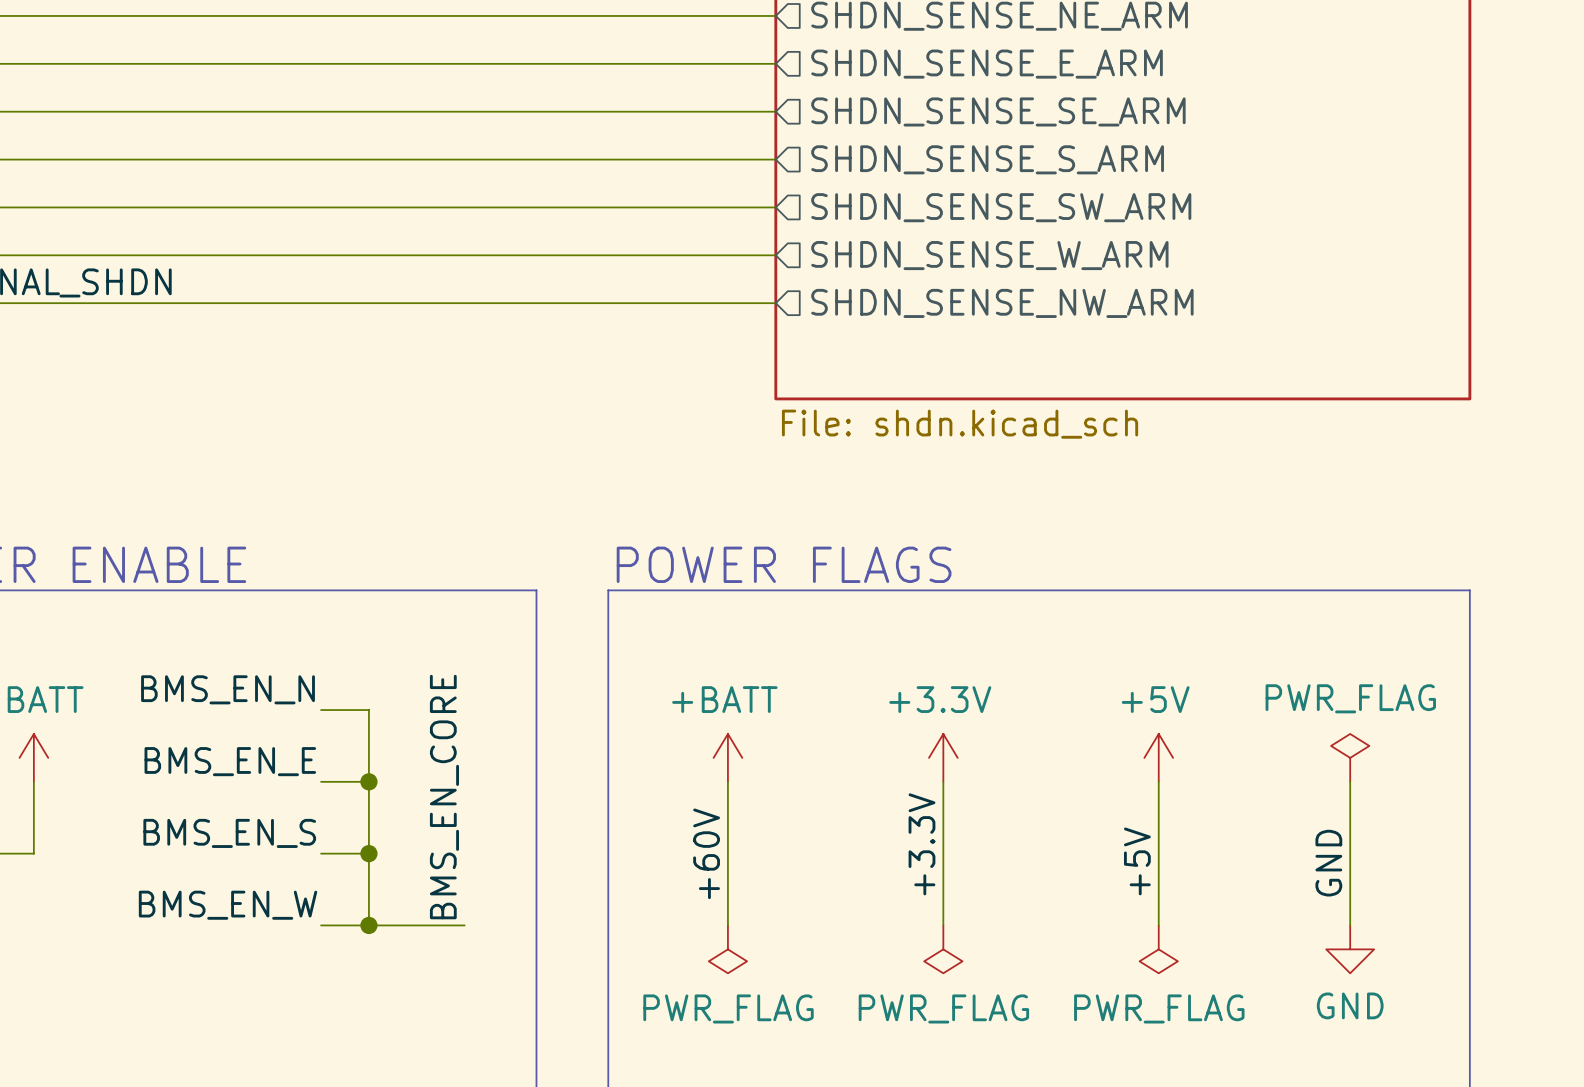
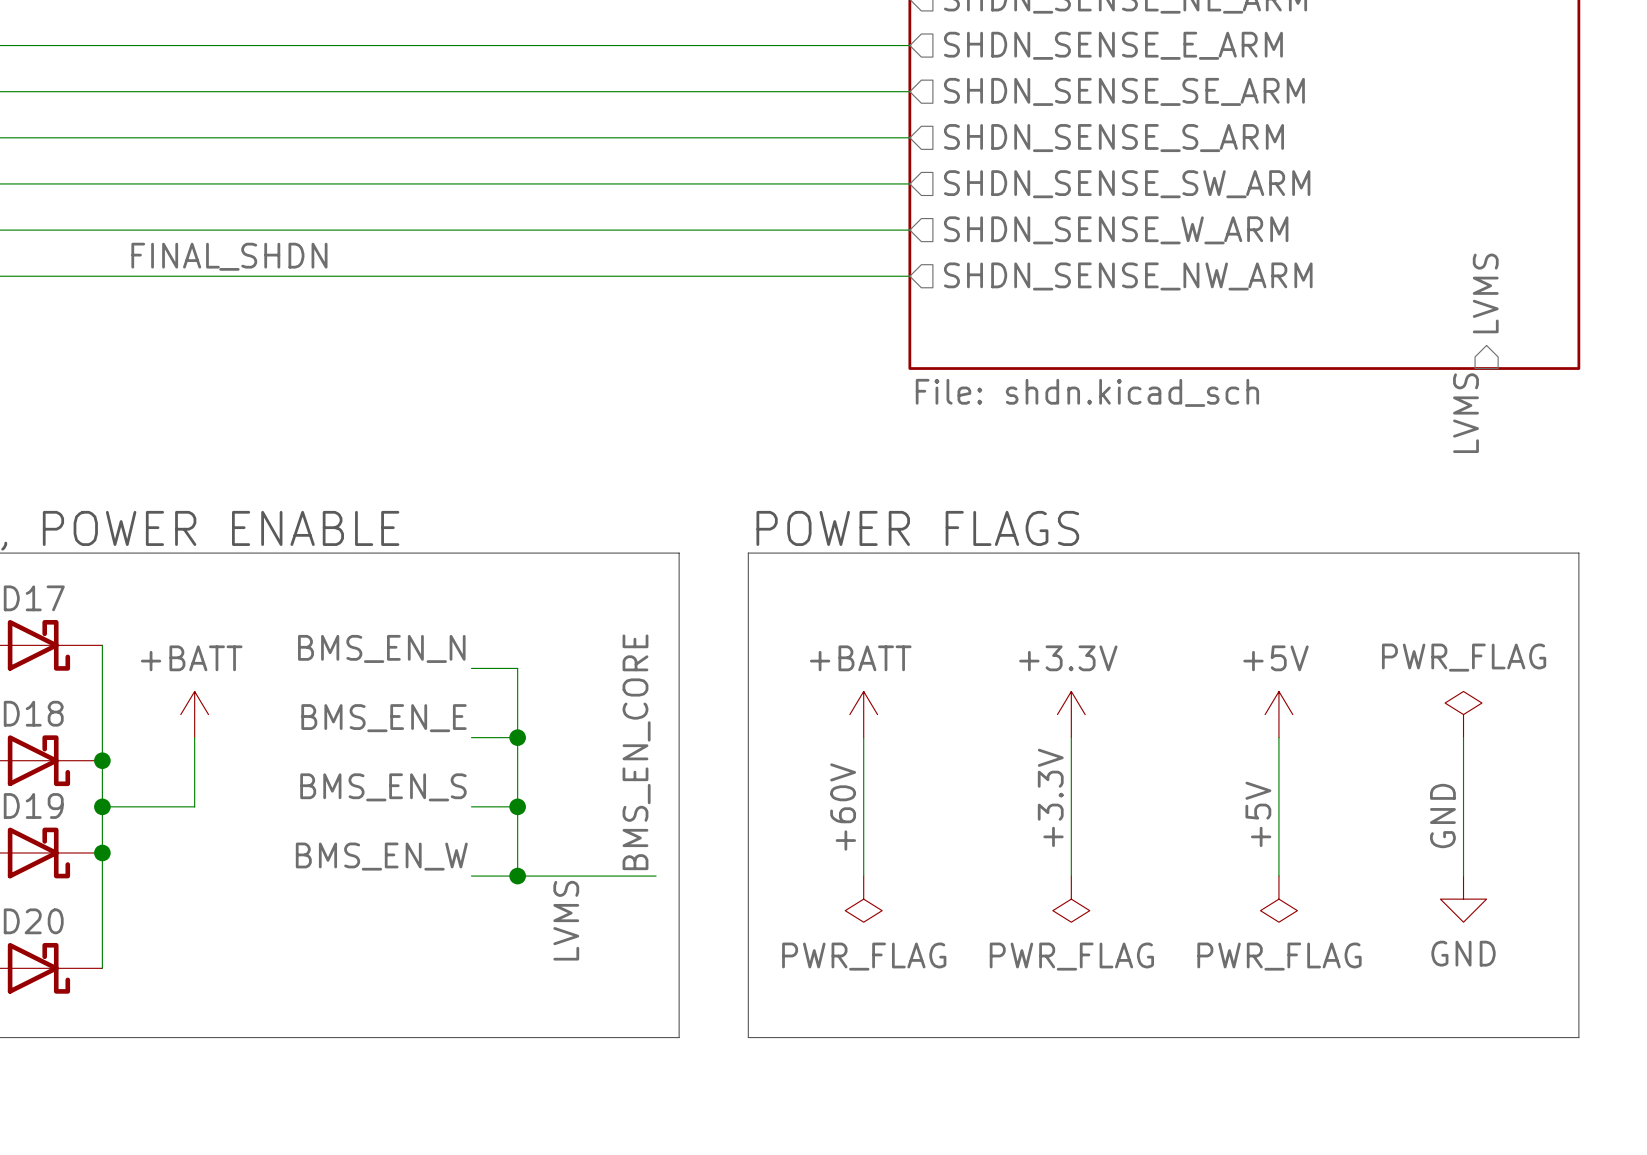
sheet pin: none -> LVMS (1485, 293)
label: none -> LVMS (1466, 413)
label position: BMS_EN_CORE (444, 797) -> BMS_EN_CORE (636, 752)
wire: none -> (609, 876) (656, 876)
label: none -> LVMS (566, 920)

